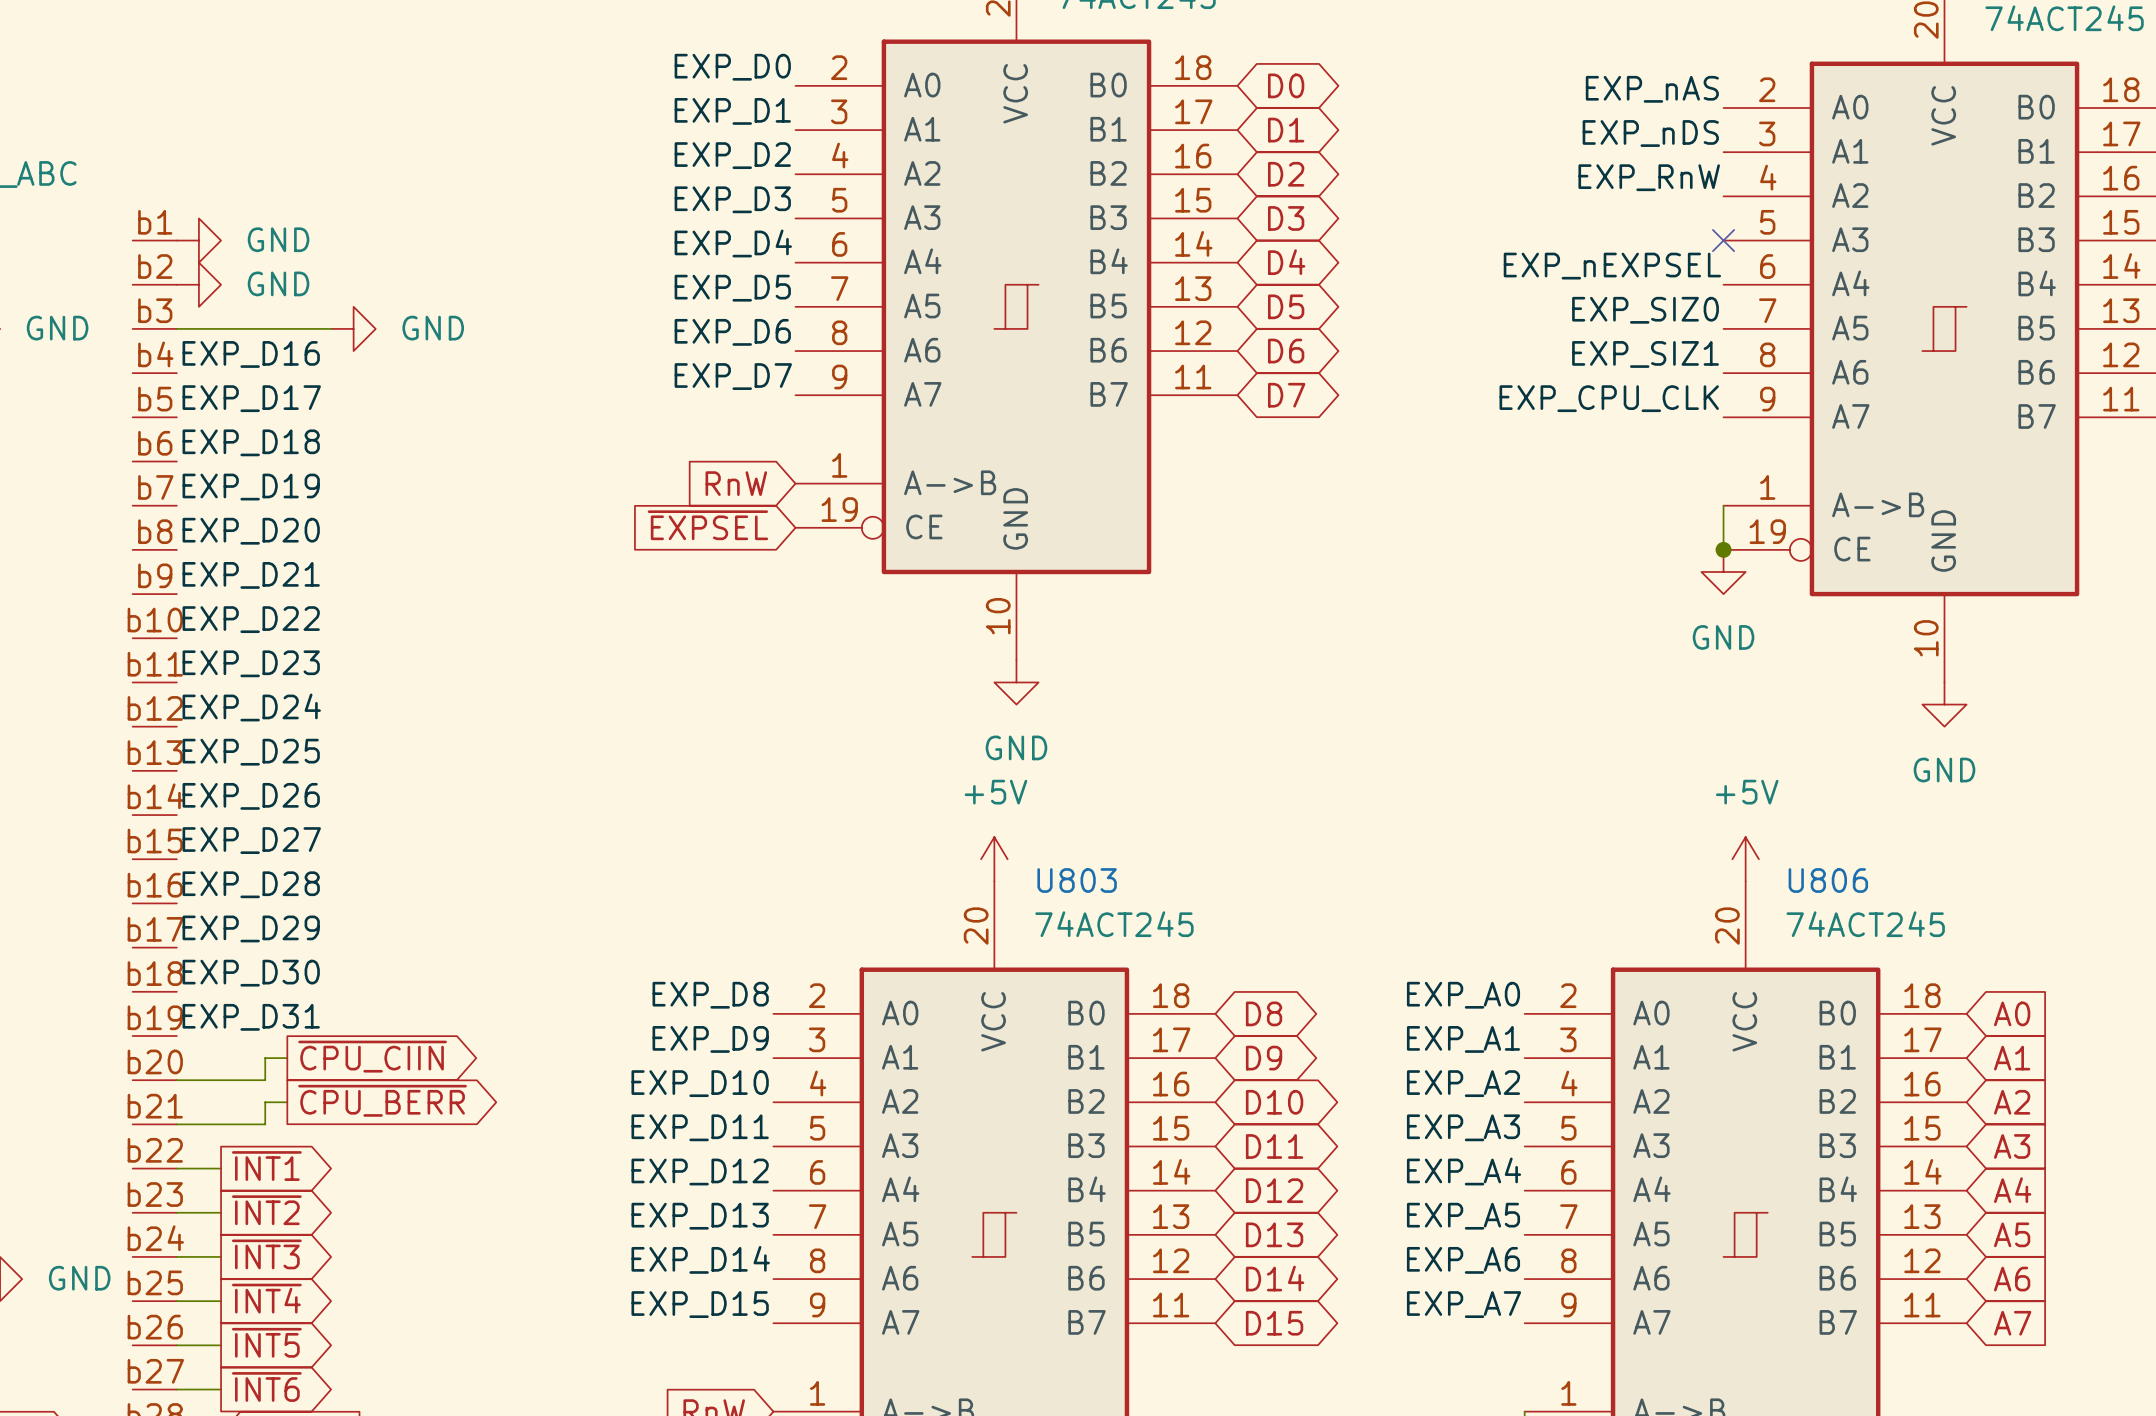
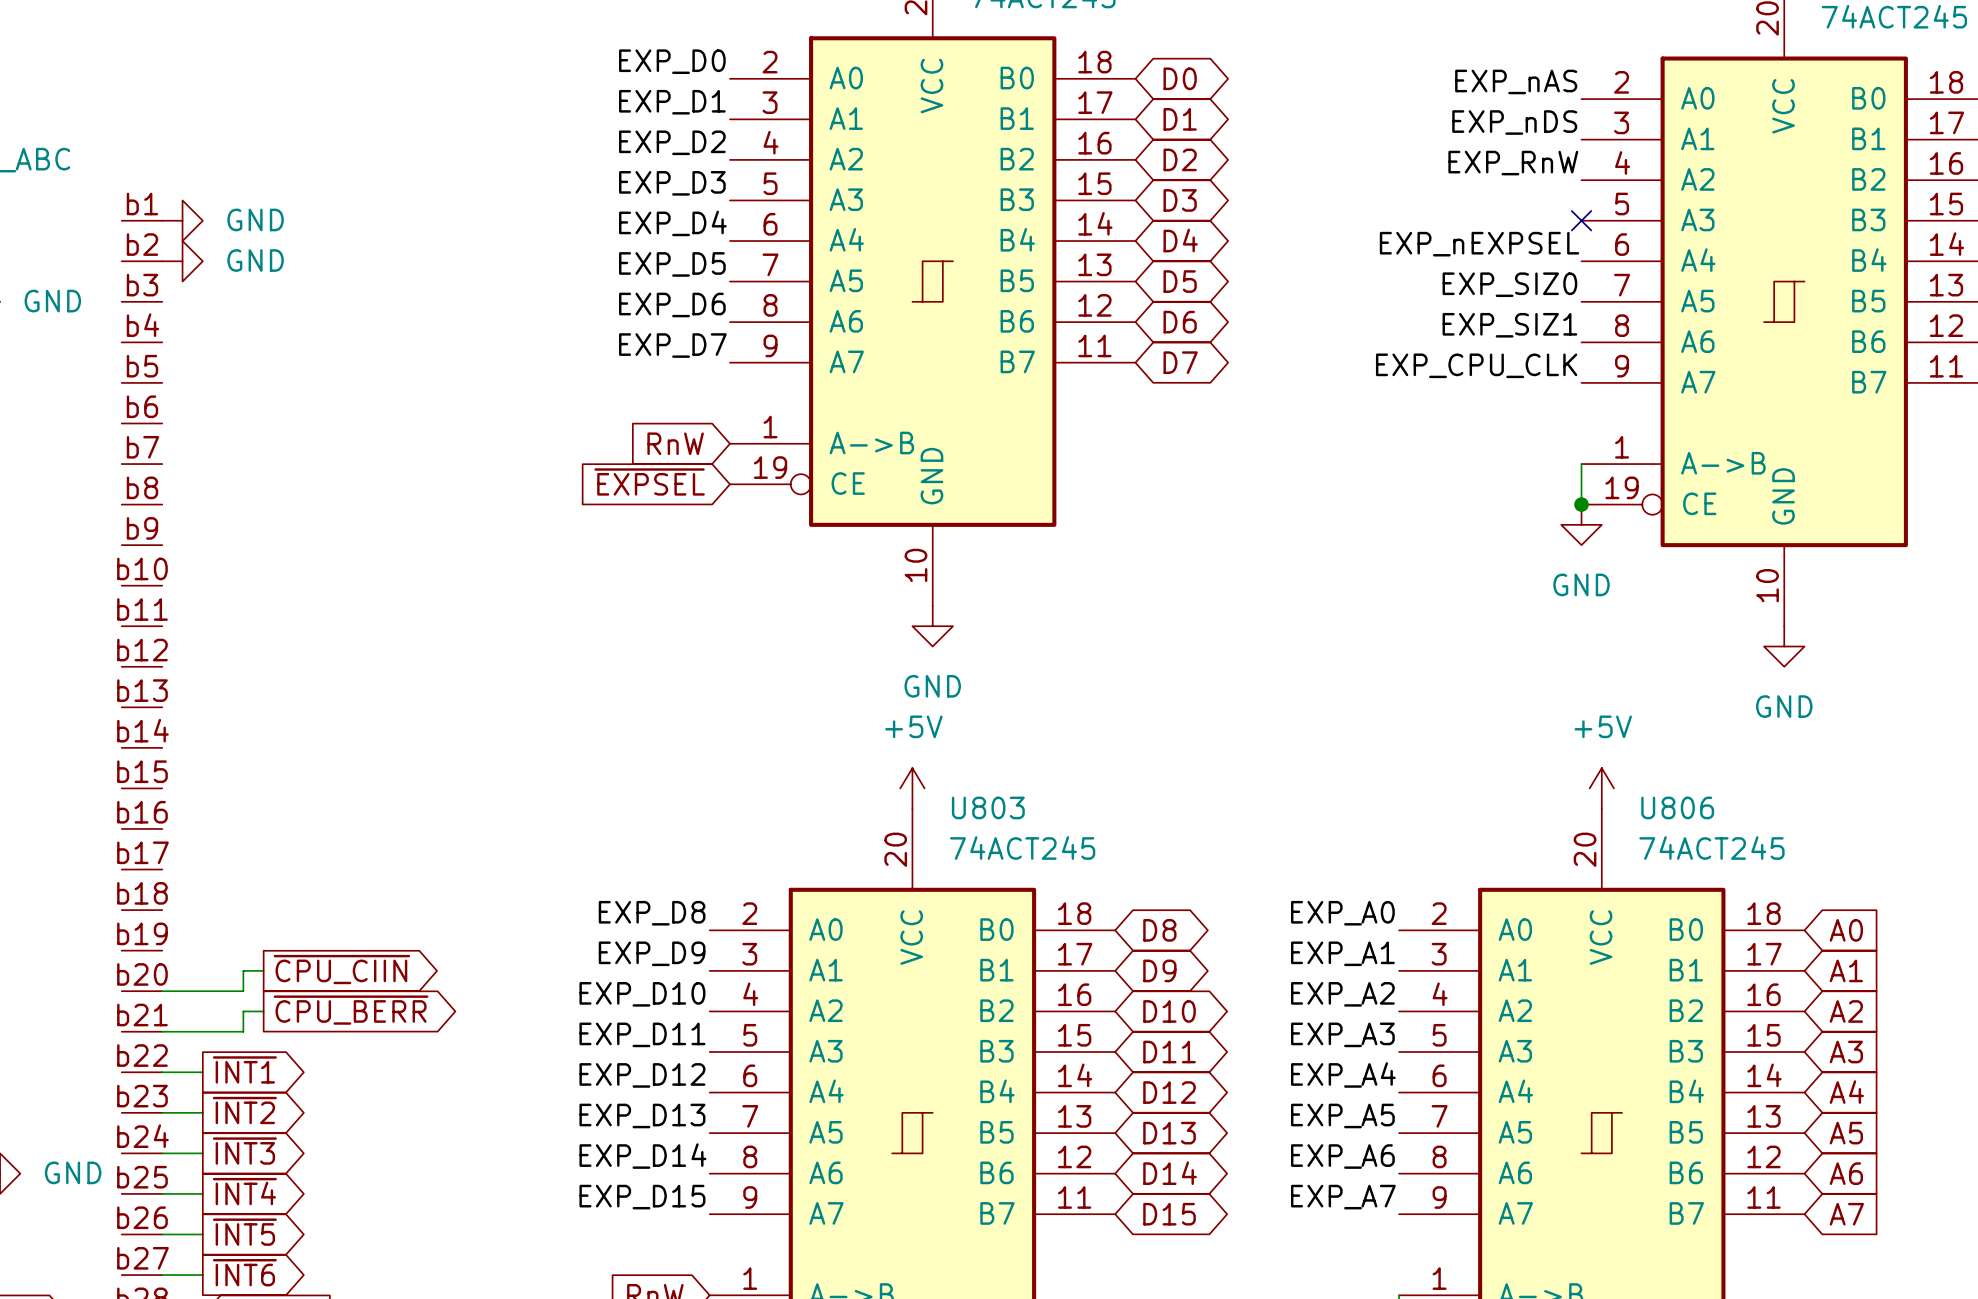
wire: (176, 328) (331, 328) -> none
power symbol: GND (353, 328) -> none
label: EXP_D16 (251, 354) -> none
label: EXP_D17 (251, 398) -> none
label: EXP_D18 (251, 442) -> none
label: EXP_D19 (251, 487) -> none
label: EXP_D20 (251, 531) -> none
label: EXP_D21 (251, 575) -> none
label: EXP_D22 (251, 619) -> none
label: EXP_D23 (251, 663) -> none
label: EXP_D24 (251, 707) -> none
label: EXP_D25 (251, 752) -> none
label: EXP_D26 (251, 796) -> none
label: EXP_D27 (251, 840) -> none
label: EXP_D28 (251, 884) -> none
label: EXP_D29 (251, 928) -> none
label: EXP_D30 (251, 973) -> none
label: EXP_D31 (251, 1017) -> none

